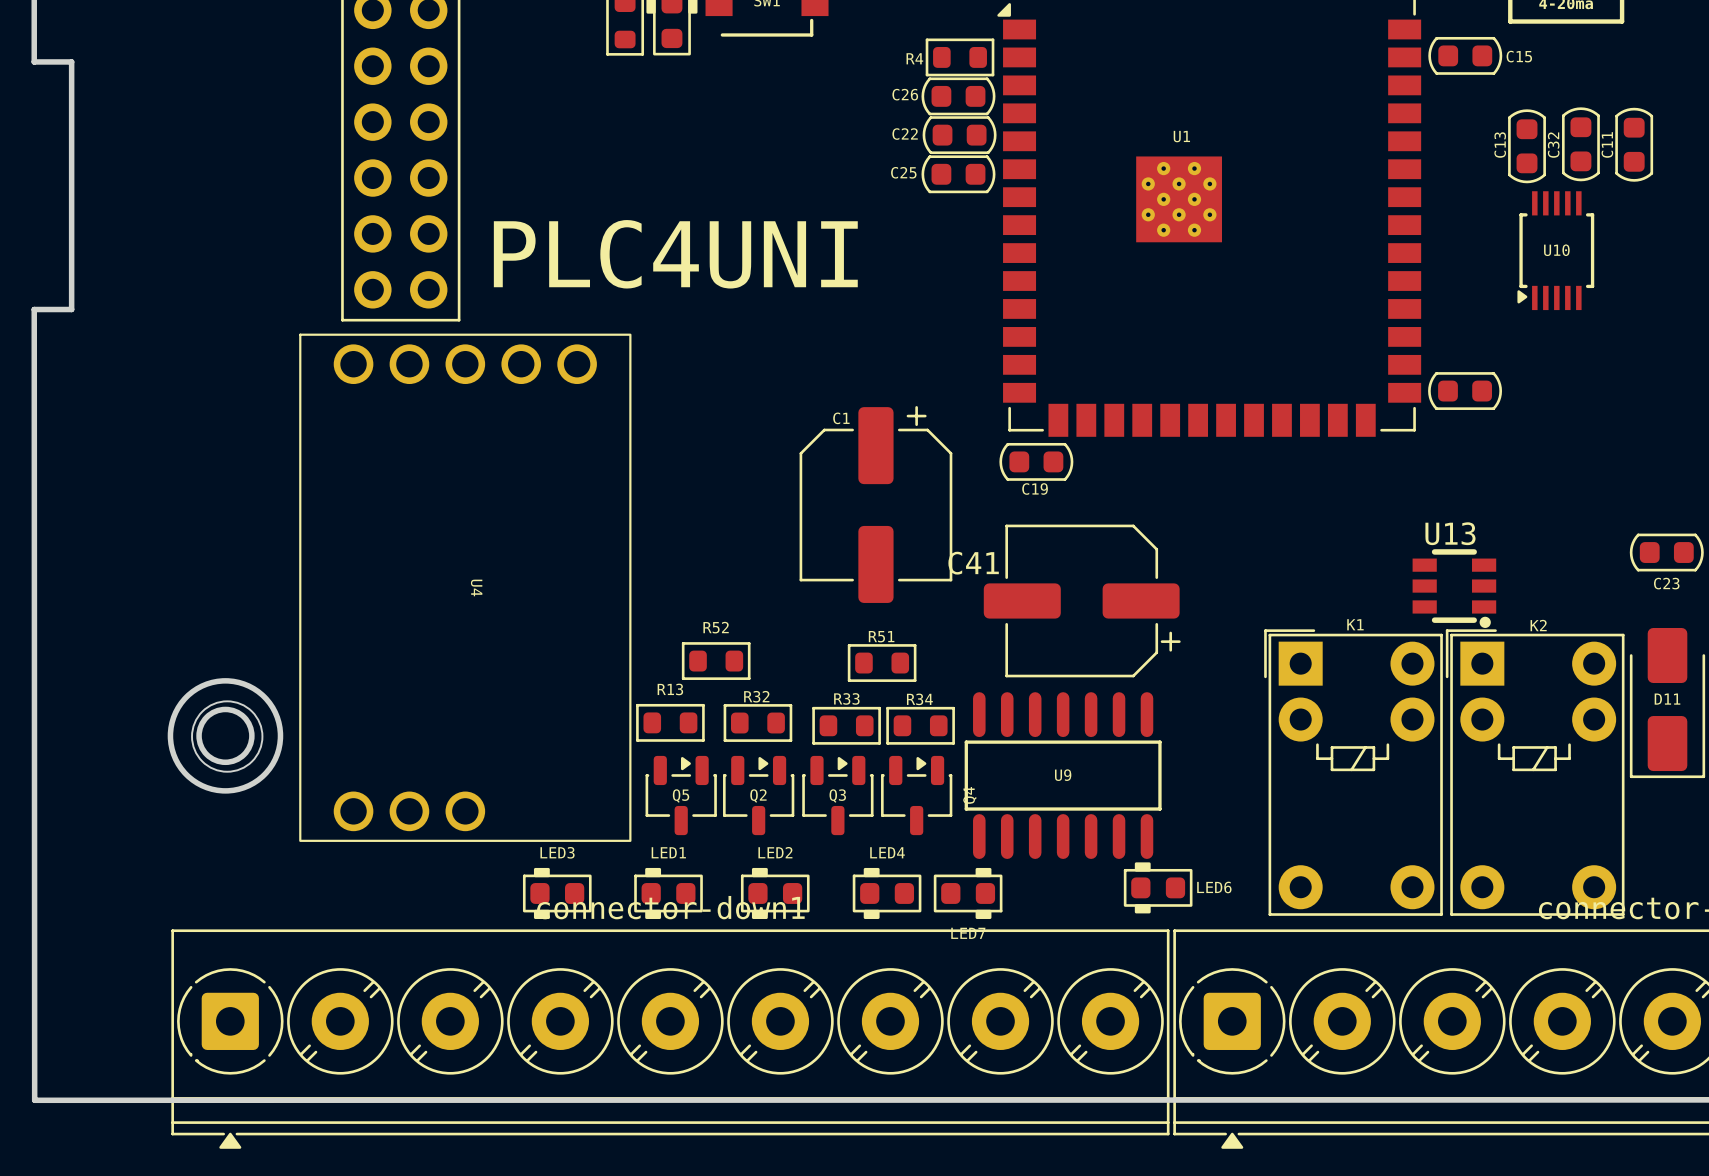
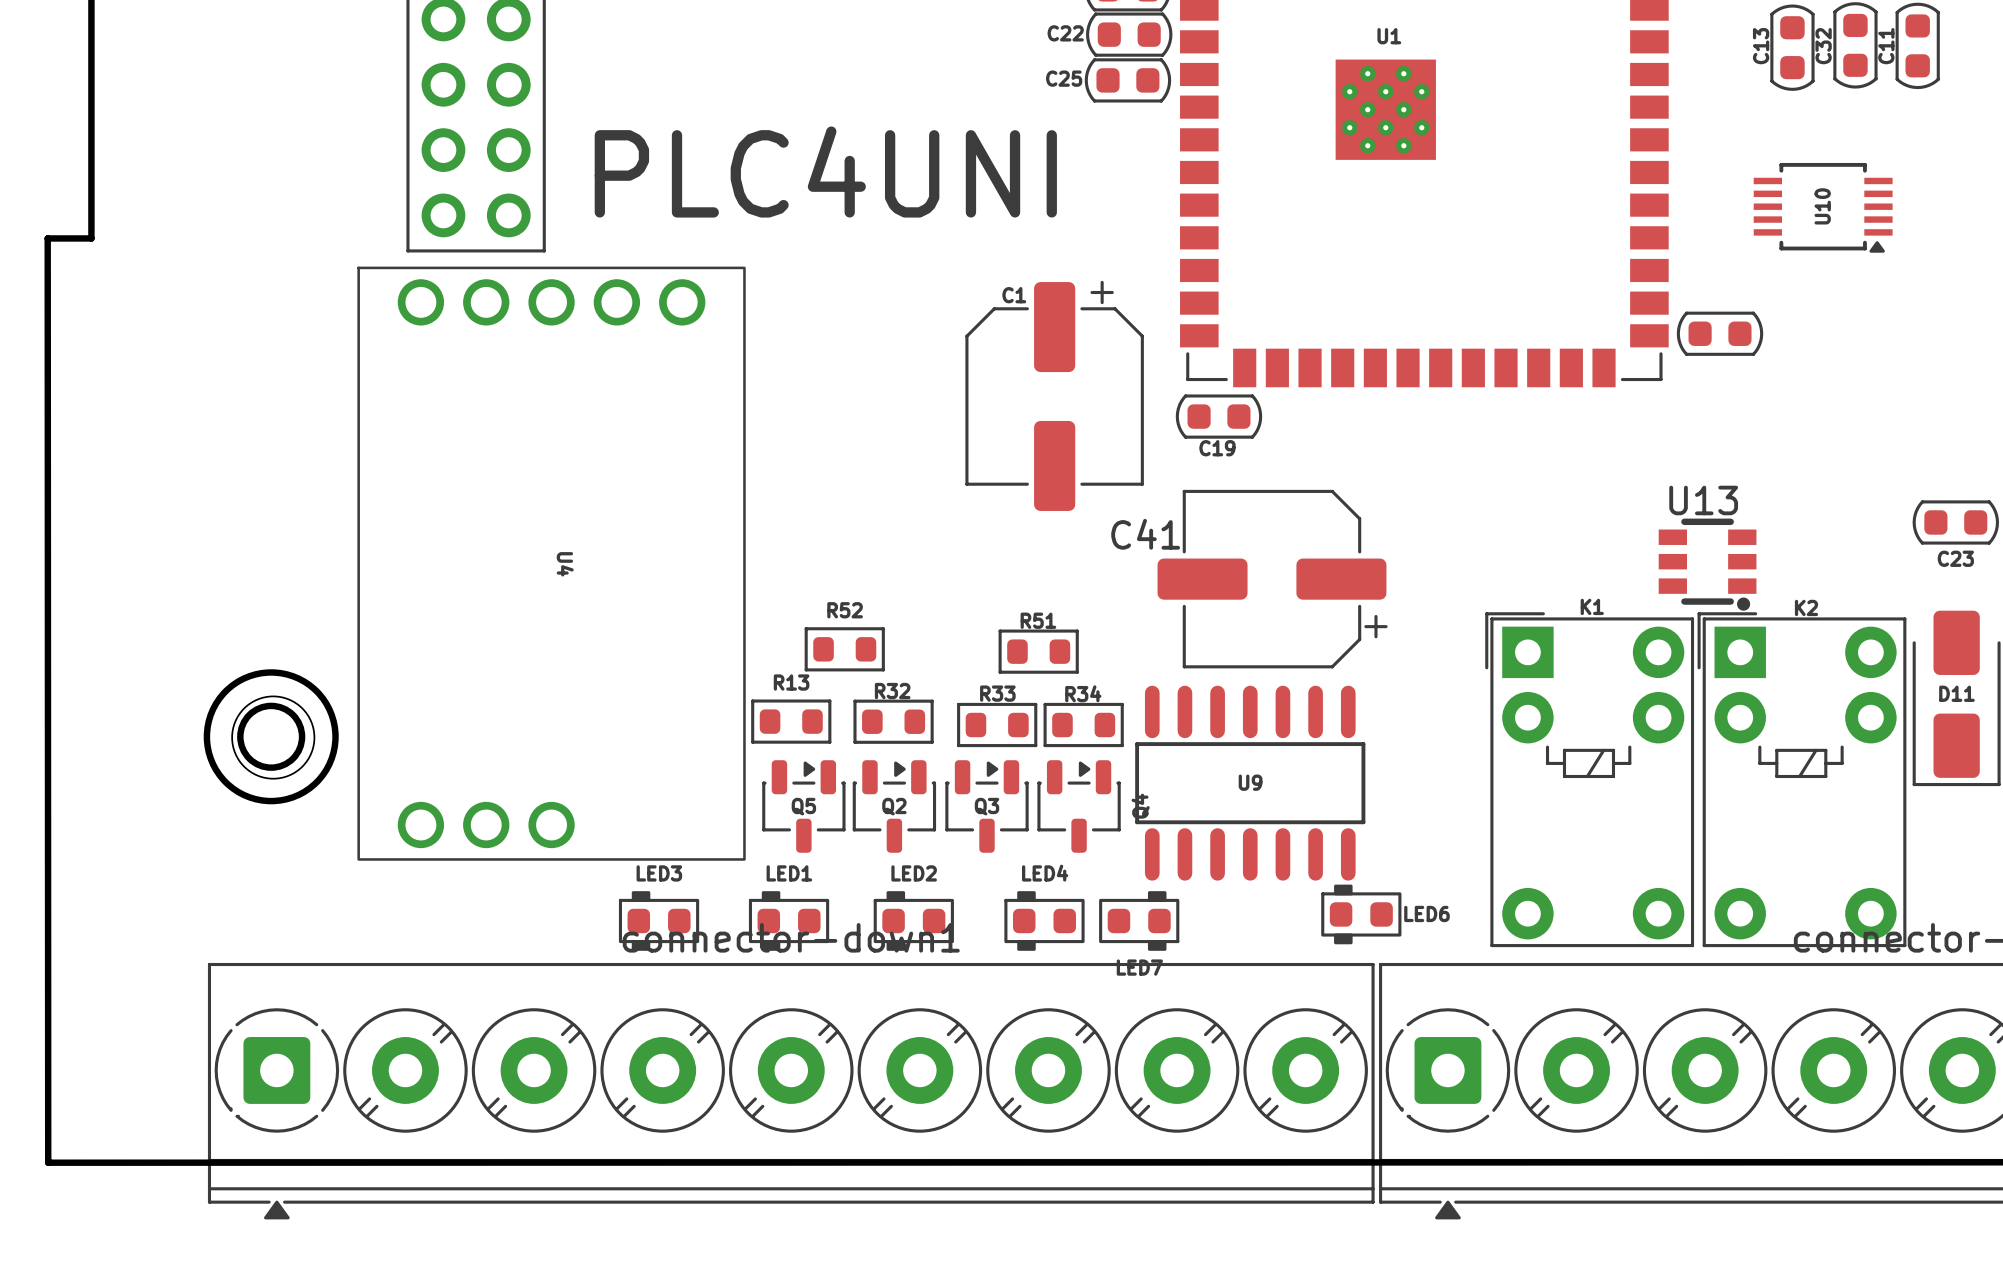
U10 rotation: 0° (1555, 250) -> 90° counterclockwise (1823, 207)
C1 position: (875, 504) -> (1054, 395)

